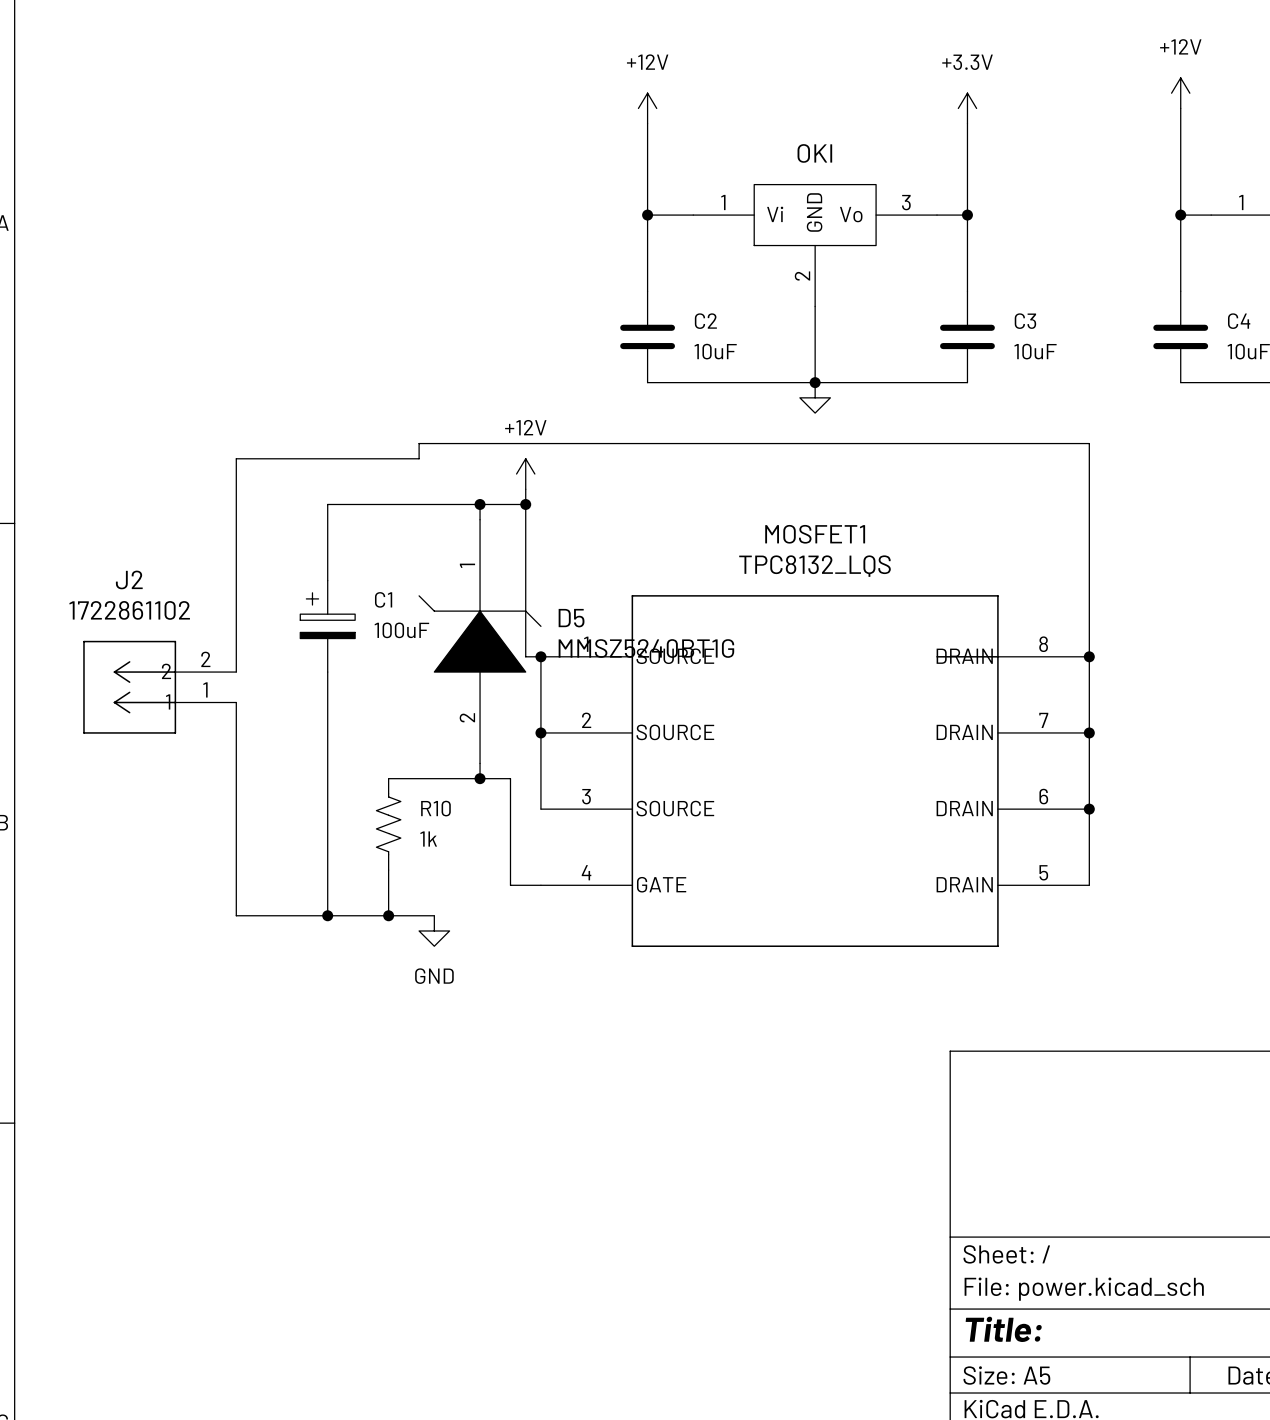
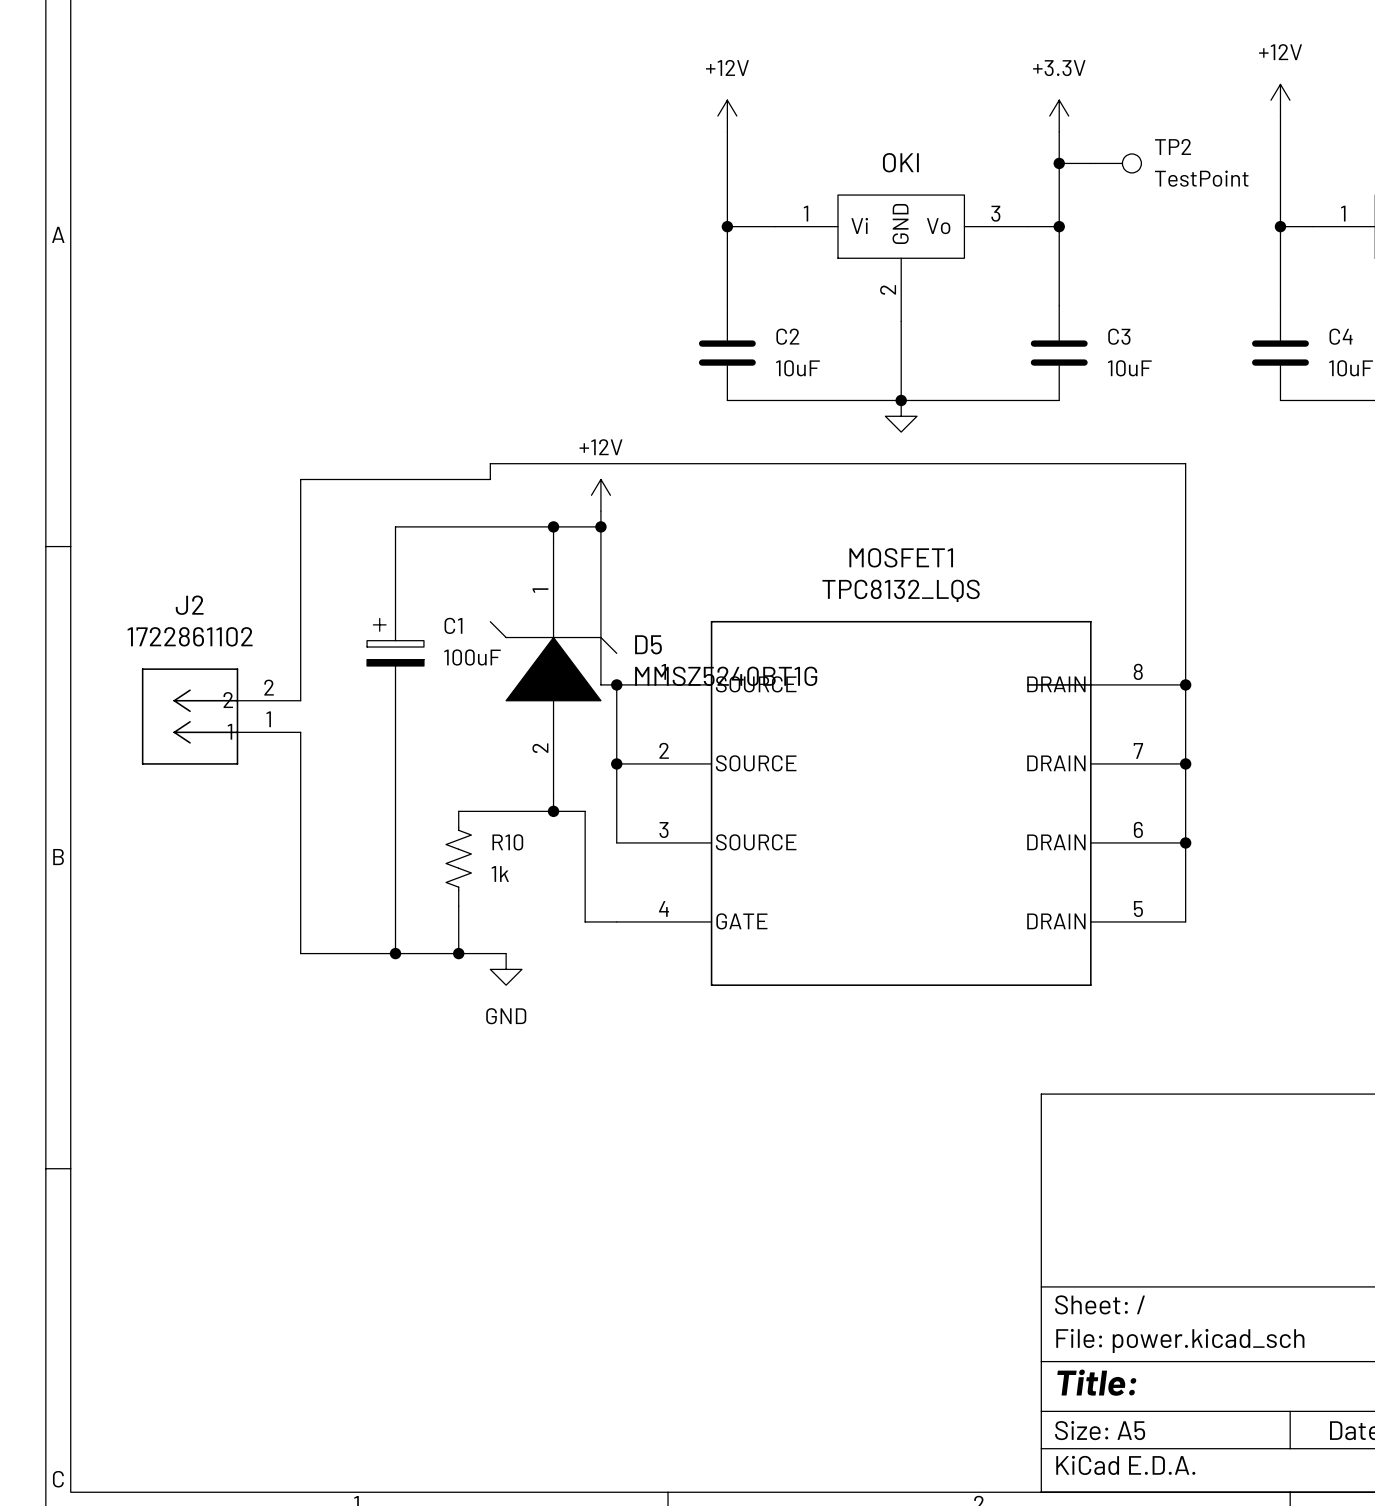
wire: none -> (1059, 163) (1090, 163)
junction: none -> (1059, 163)
TP2: none -> TestPoint (1116, 163)

